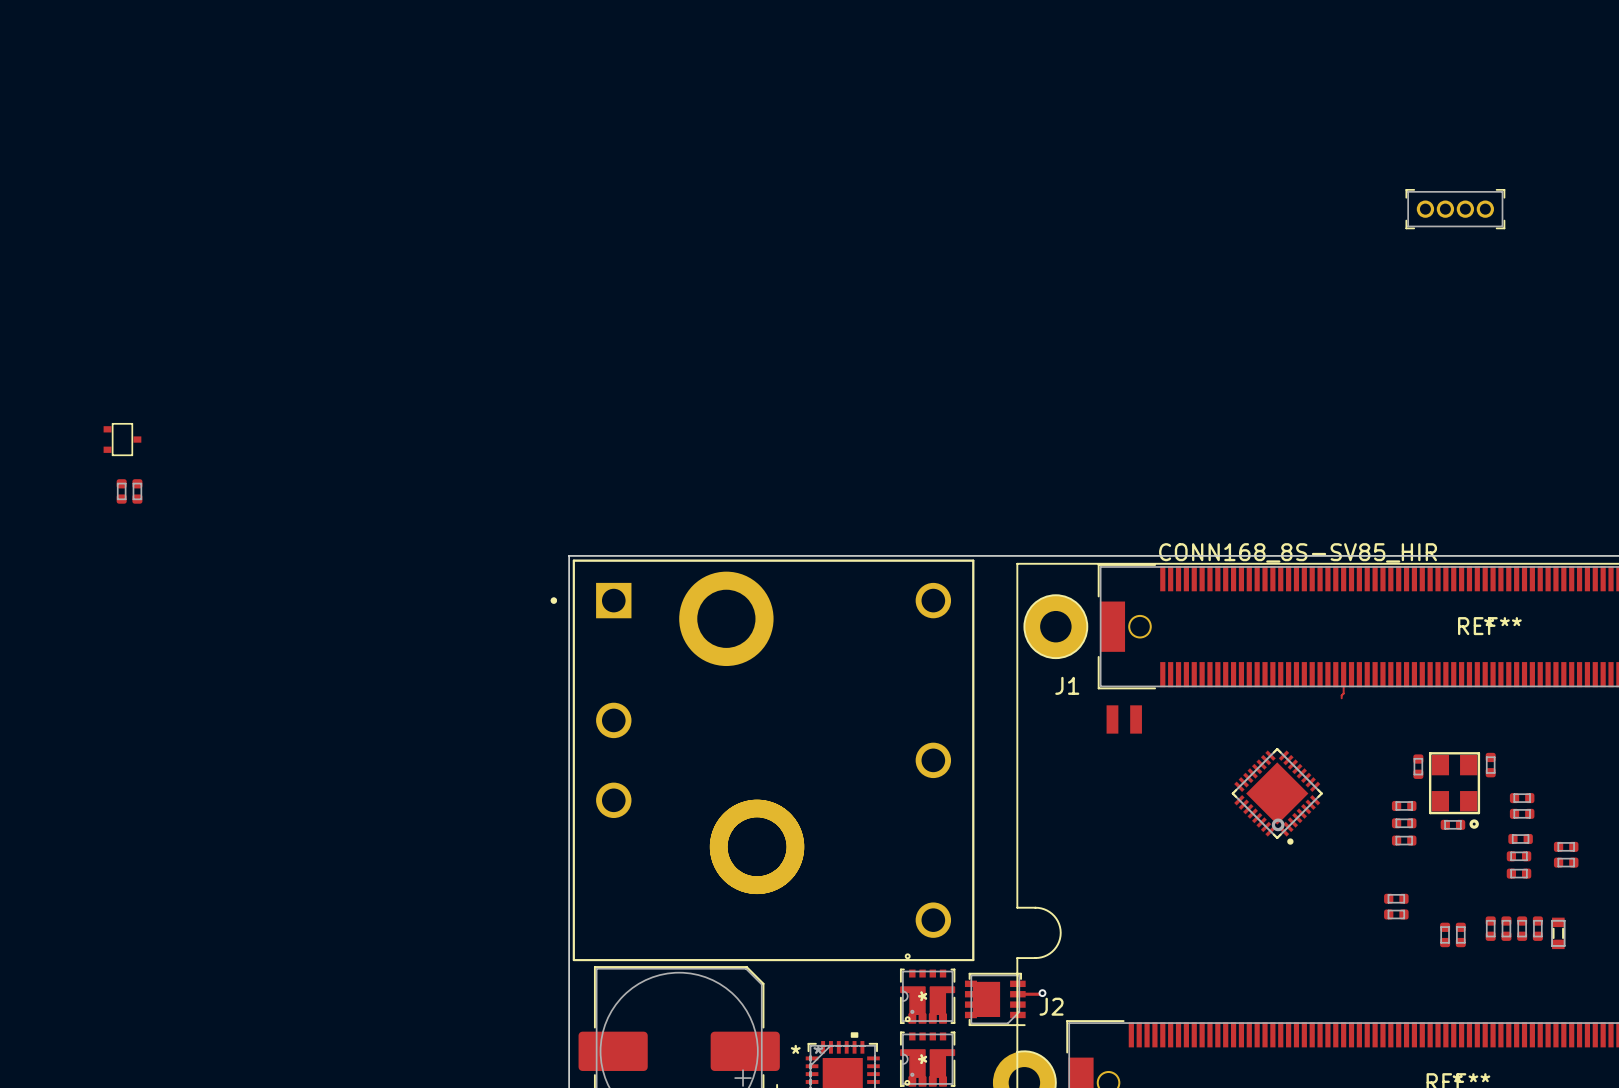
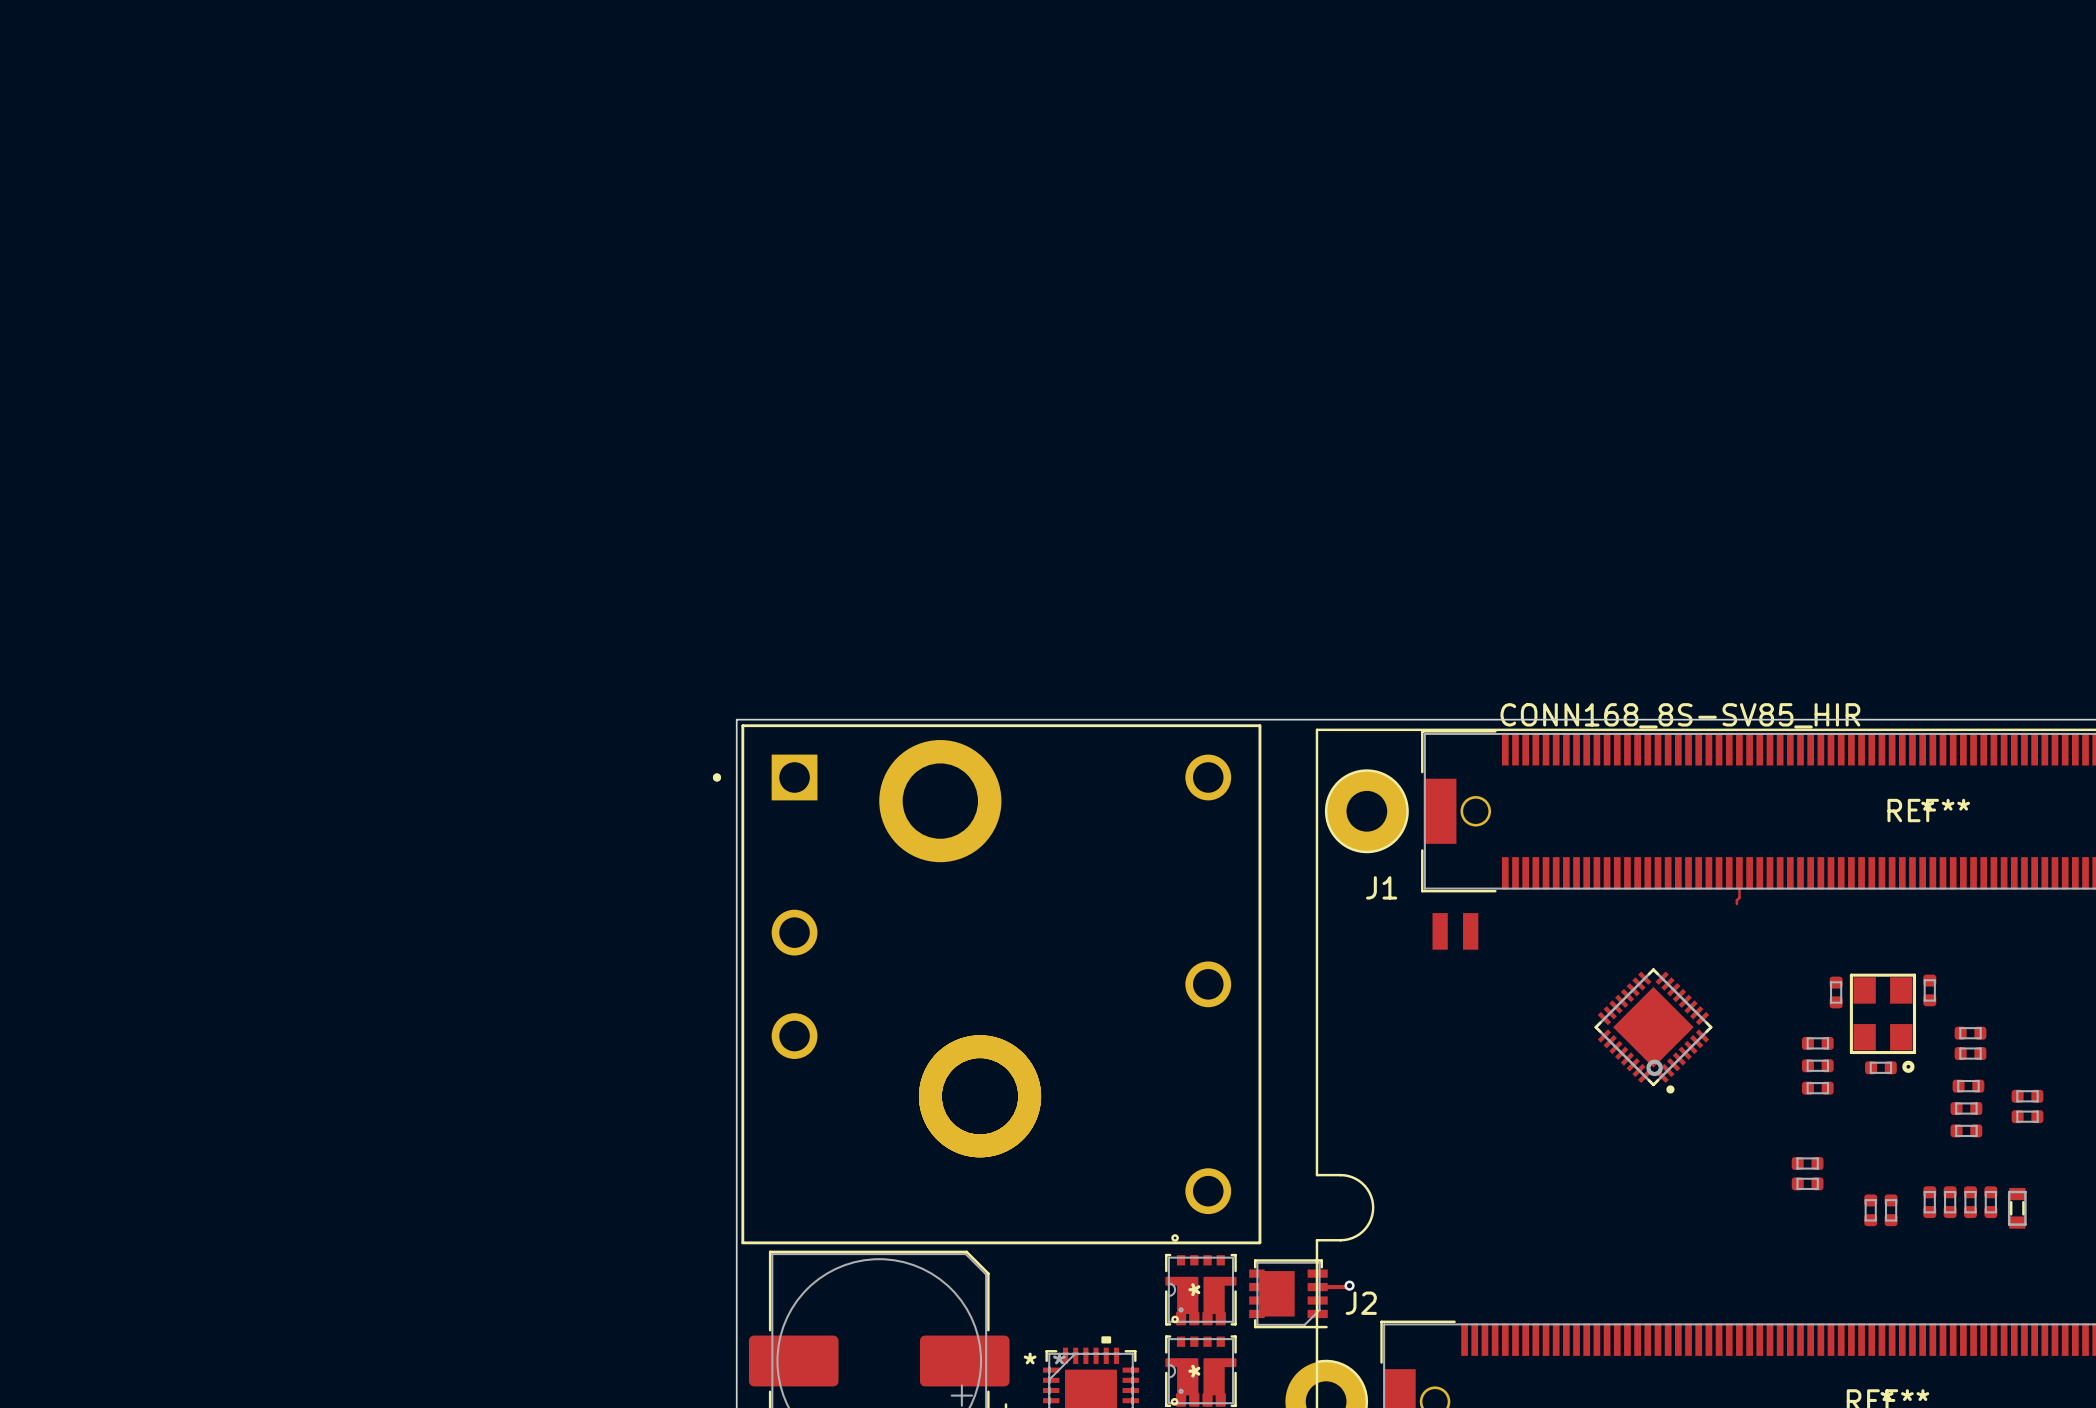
part: (1455, 209) -> none
part: (122, 439) -> none
part: (121, 491) -> none
part: (137, 491) -> none

